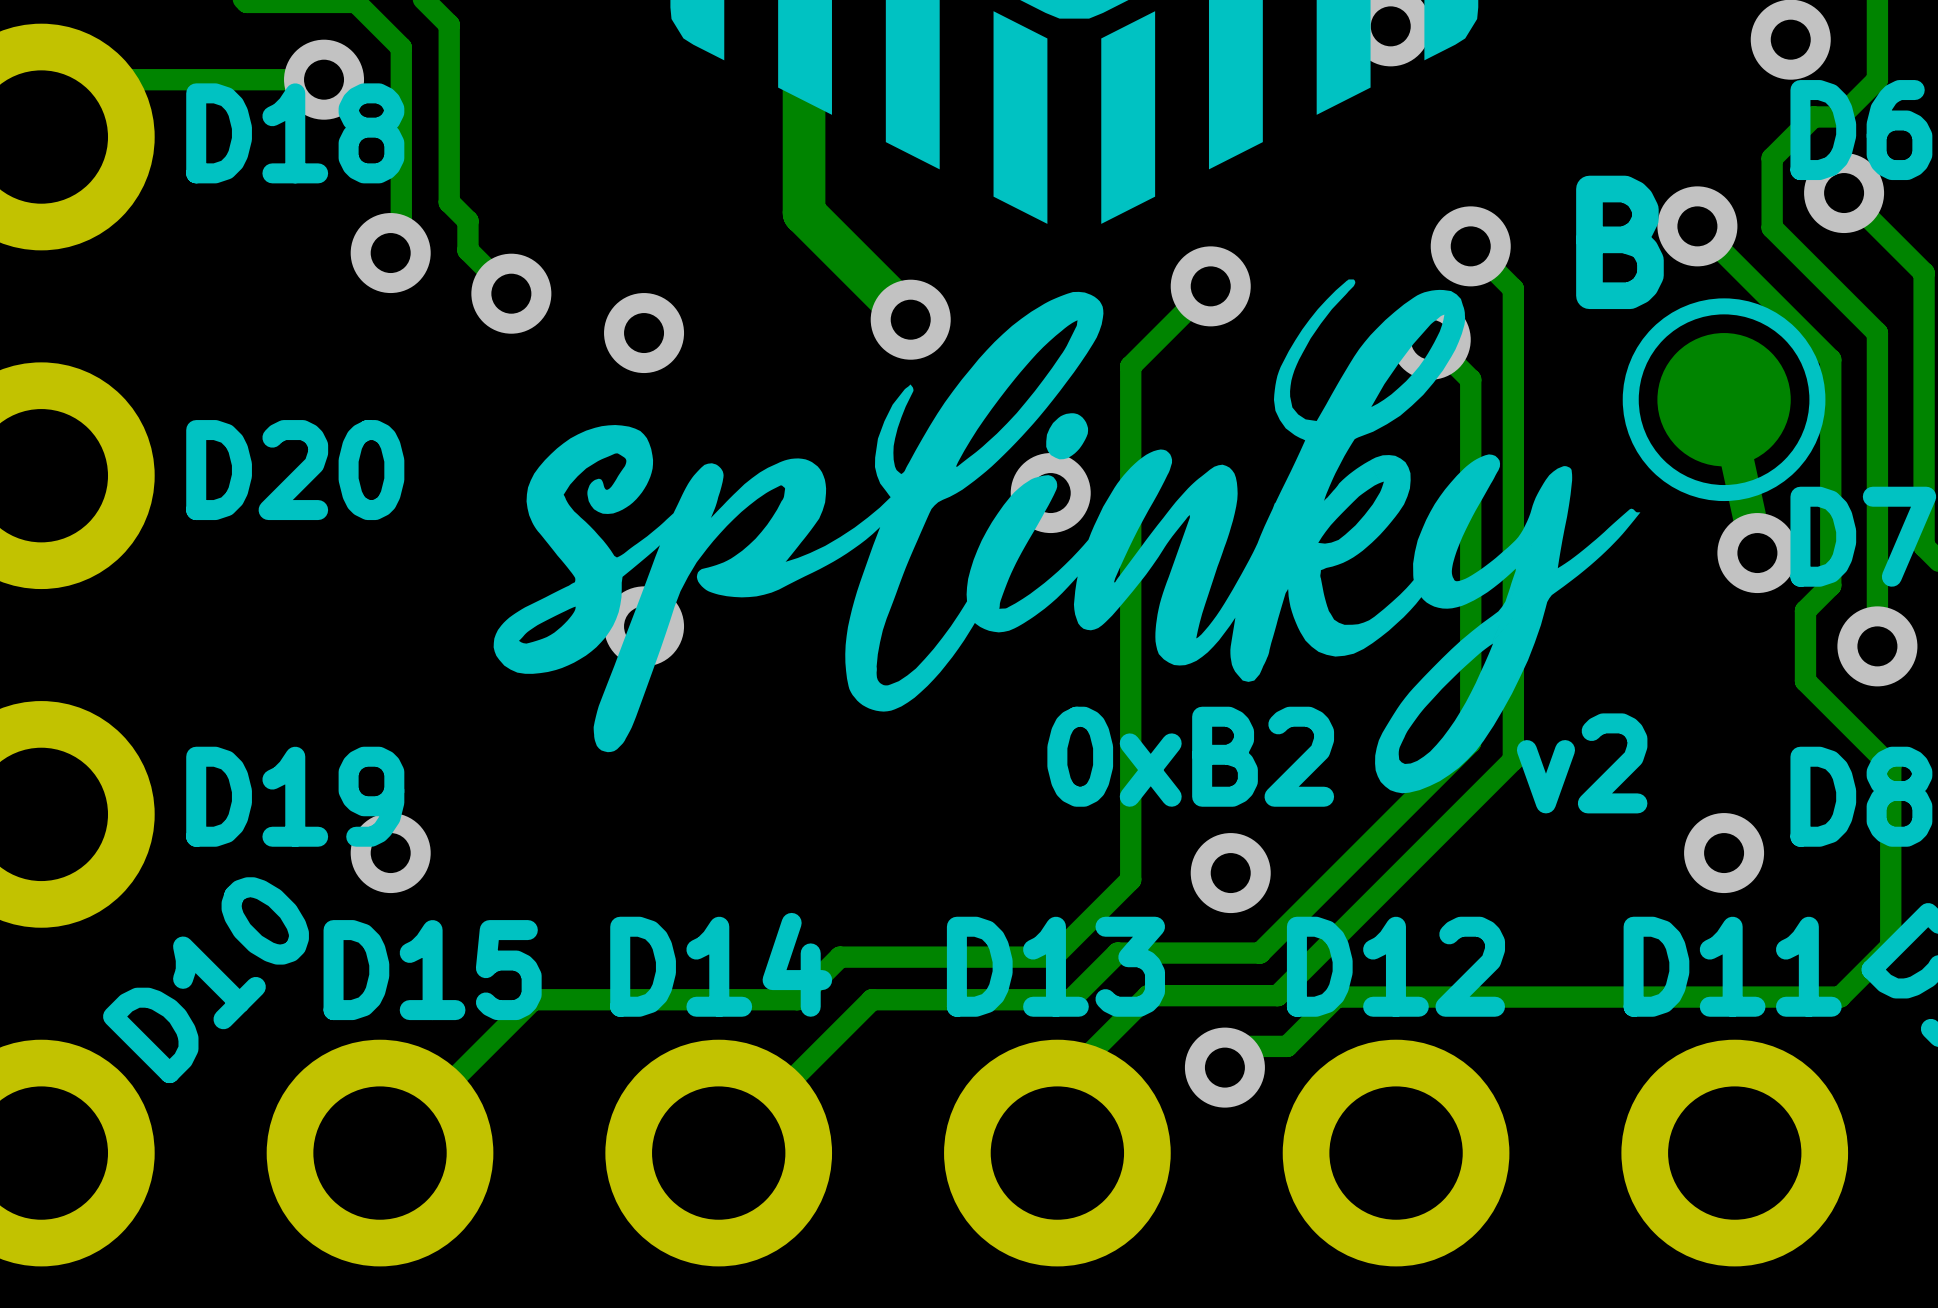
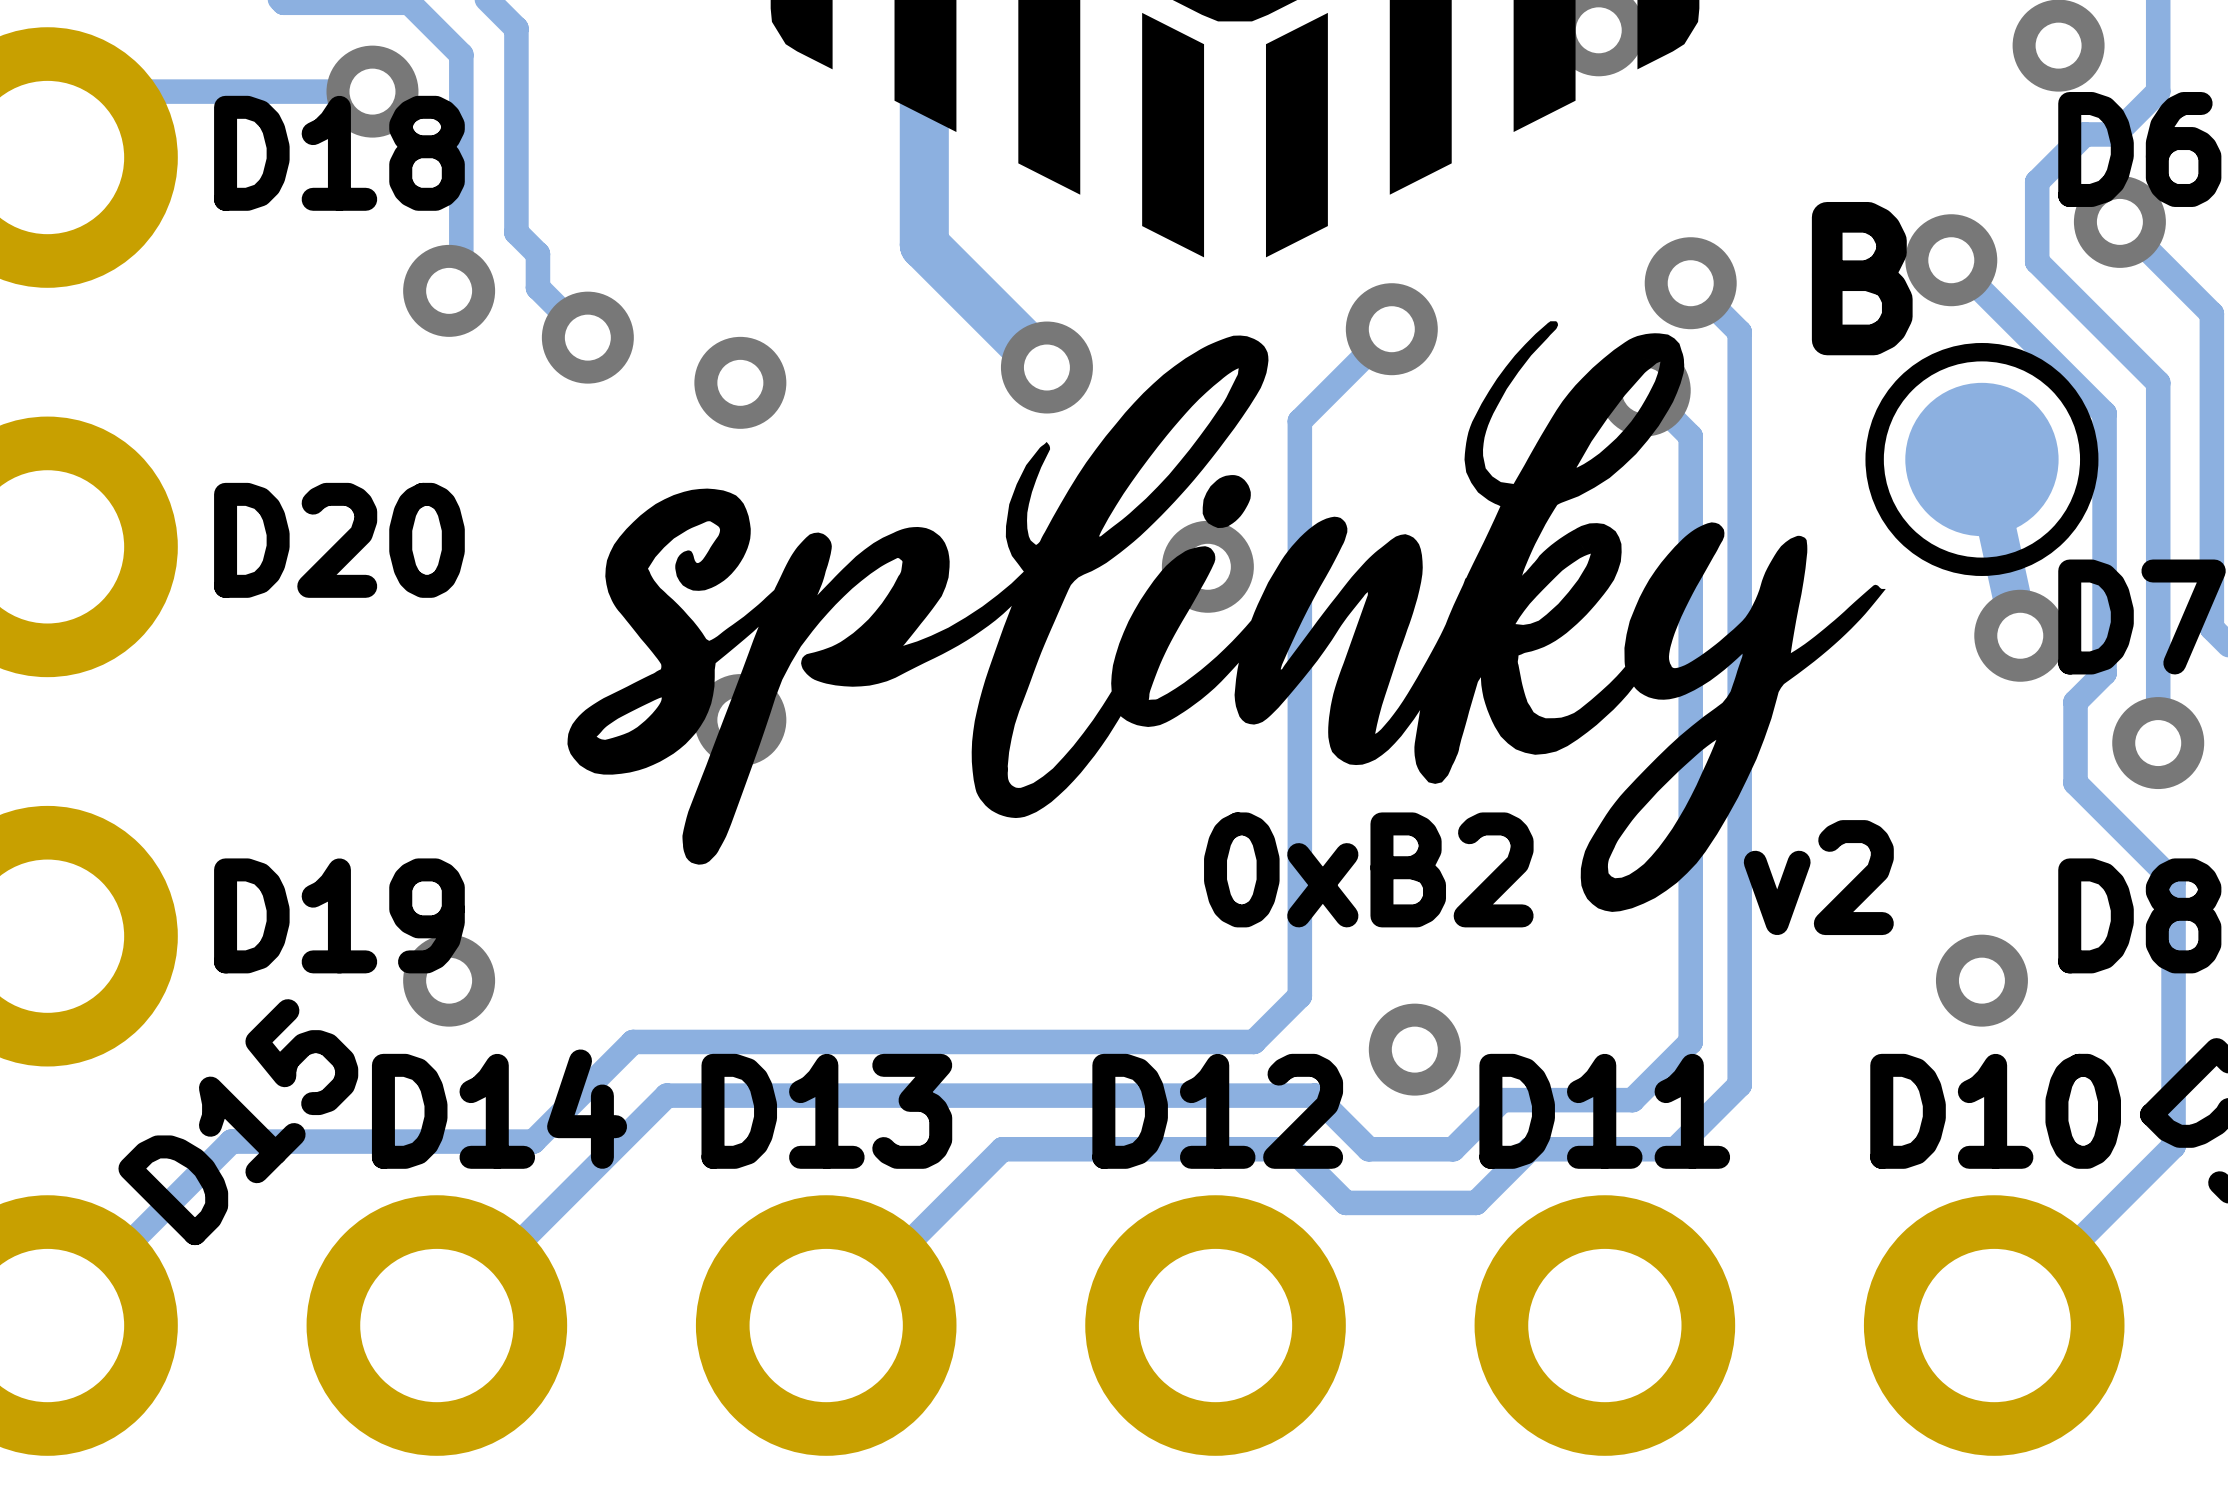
track: (1470, 742) (1260, 953) (1144, 953) -> (1690, 853) (1690, 1041) (1632, 1100) (1502, 1100) (1453, 1149) (1368, 1149) (1315, 1095)
track: (1513, 759) (1277, 995) (1148, 995) (1057, 1086) (1057, 1153) -> (1739, 873) (1739, 1084) (1675, 1149) (1529, 1149) (1476, 1202)
track: (1130, 866) (1130, 879) (1053, 957) (839, 957) (797, 999) (533, 999) -> (1284, 1095) (666, 1095) (613, 1149)
track: none -> (1299, 995) (1253, 1041) (633, 1041) (533, 1141) (231, 1141) (47, 1325)
via position: (1230, 873) -> (1414, 1049)
track: (1890, 946) (1840, 997) (1336, 997) (1287, 1046) (1284, 1046) -> (2173, 1087) (2173, 1146) (1994, 1325)
track: (1117, 953) (1070, 999) -> (1432, 1202) (1345, 1202) (1292, 1149) (1231, 1149)
part text: none -> D14 (499, 1109)
part text: D14 (721, 964) -> D13 (826, 1111)
part text: D13 (1055, 966) -> none
part text: none -> D12 (1217, 1111)
part text: D12 (1395, 966) -> D11 (1604, 1111)
part text: D11 (1732, 966) -> none
part text: none -> D10 (1995, 1111)
part text: D15 (432, 970) -> none
part text: D10 (205, 980) -> D15 (238, 1122)
via: (1224, 1067) -> none

